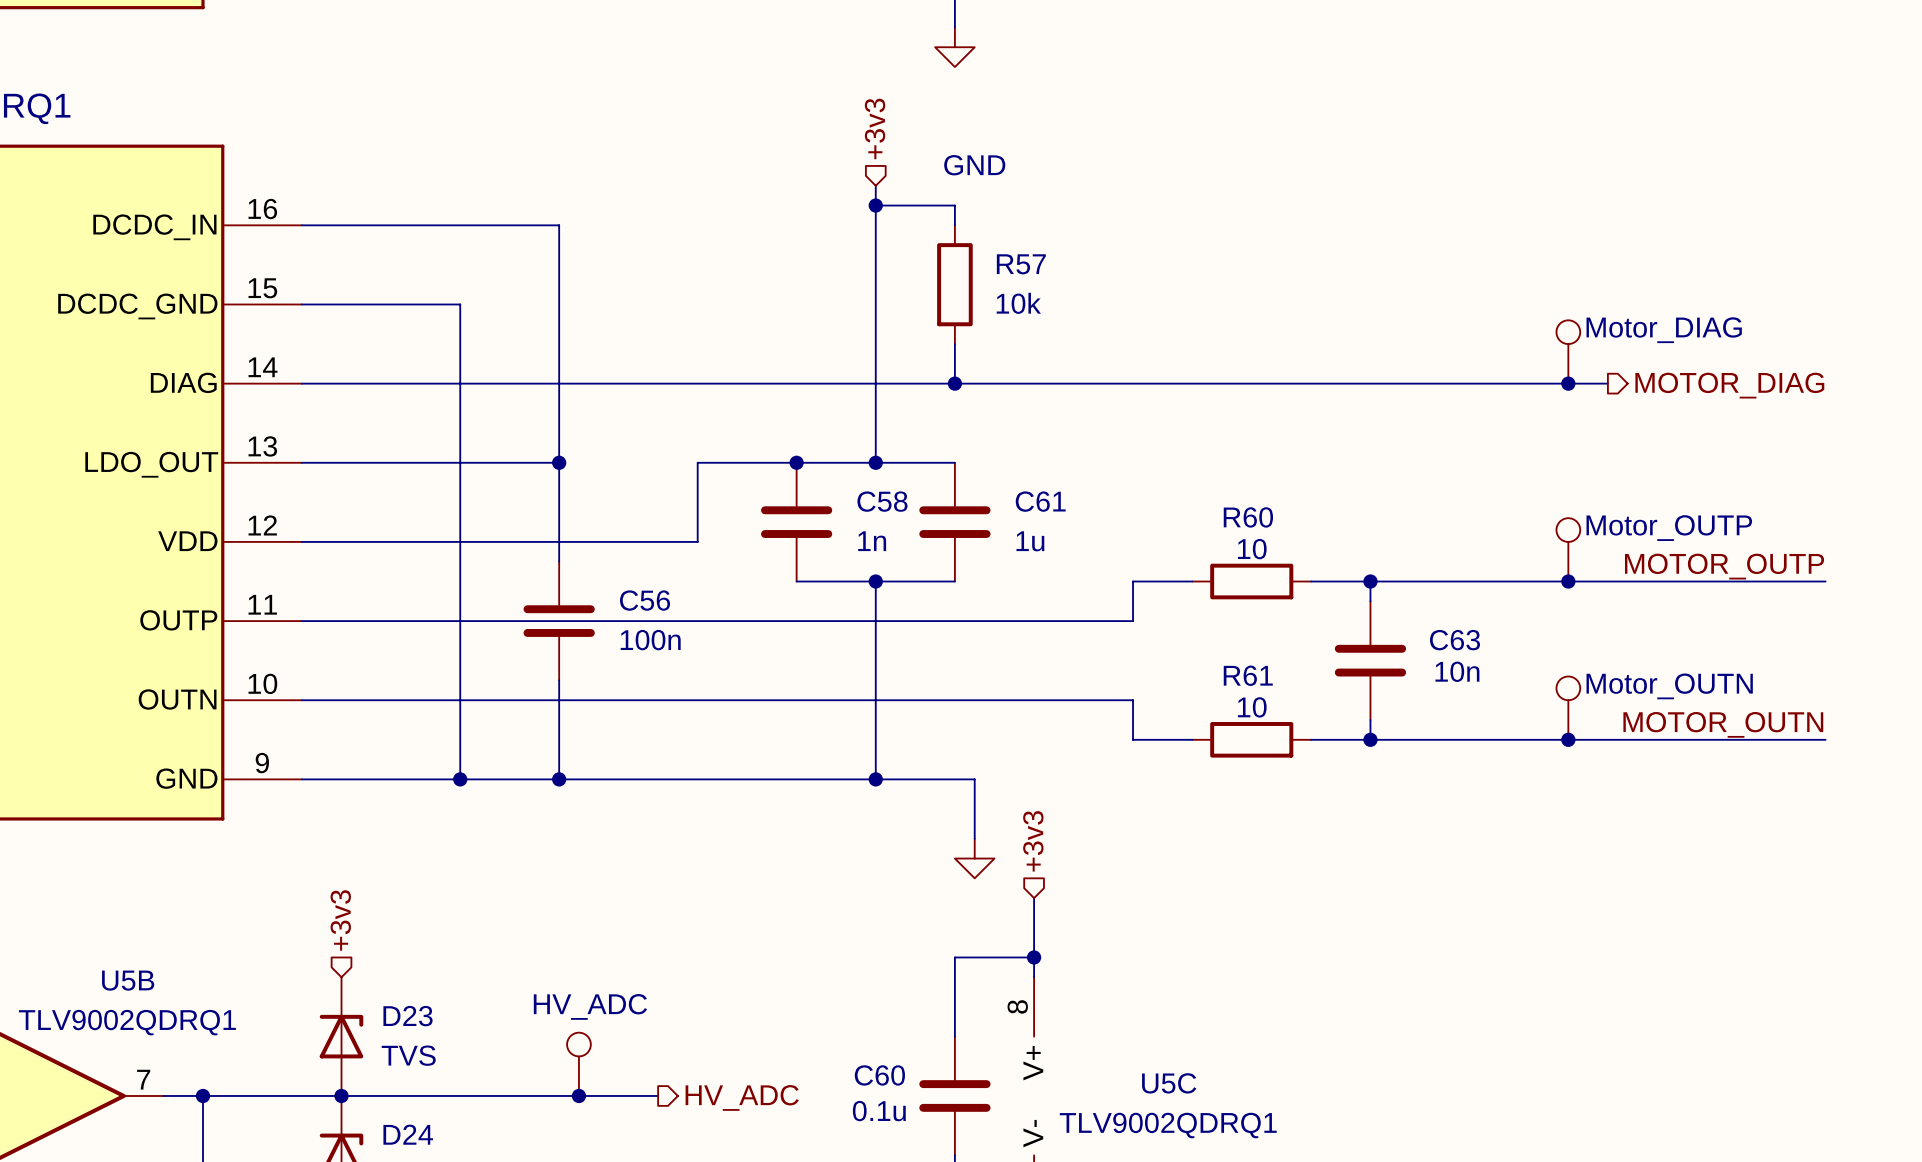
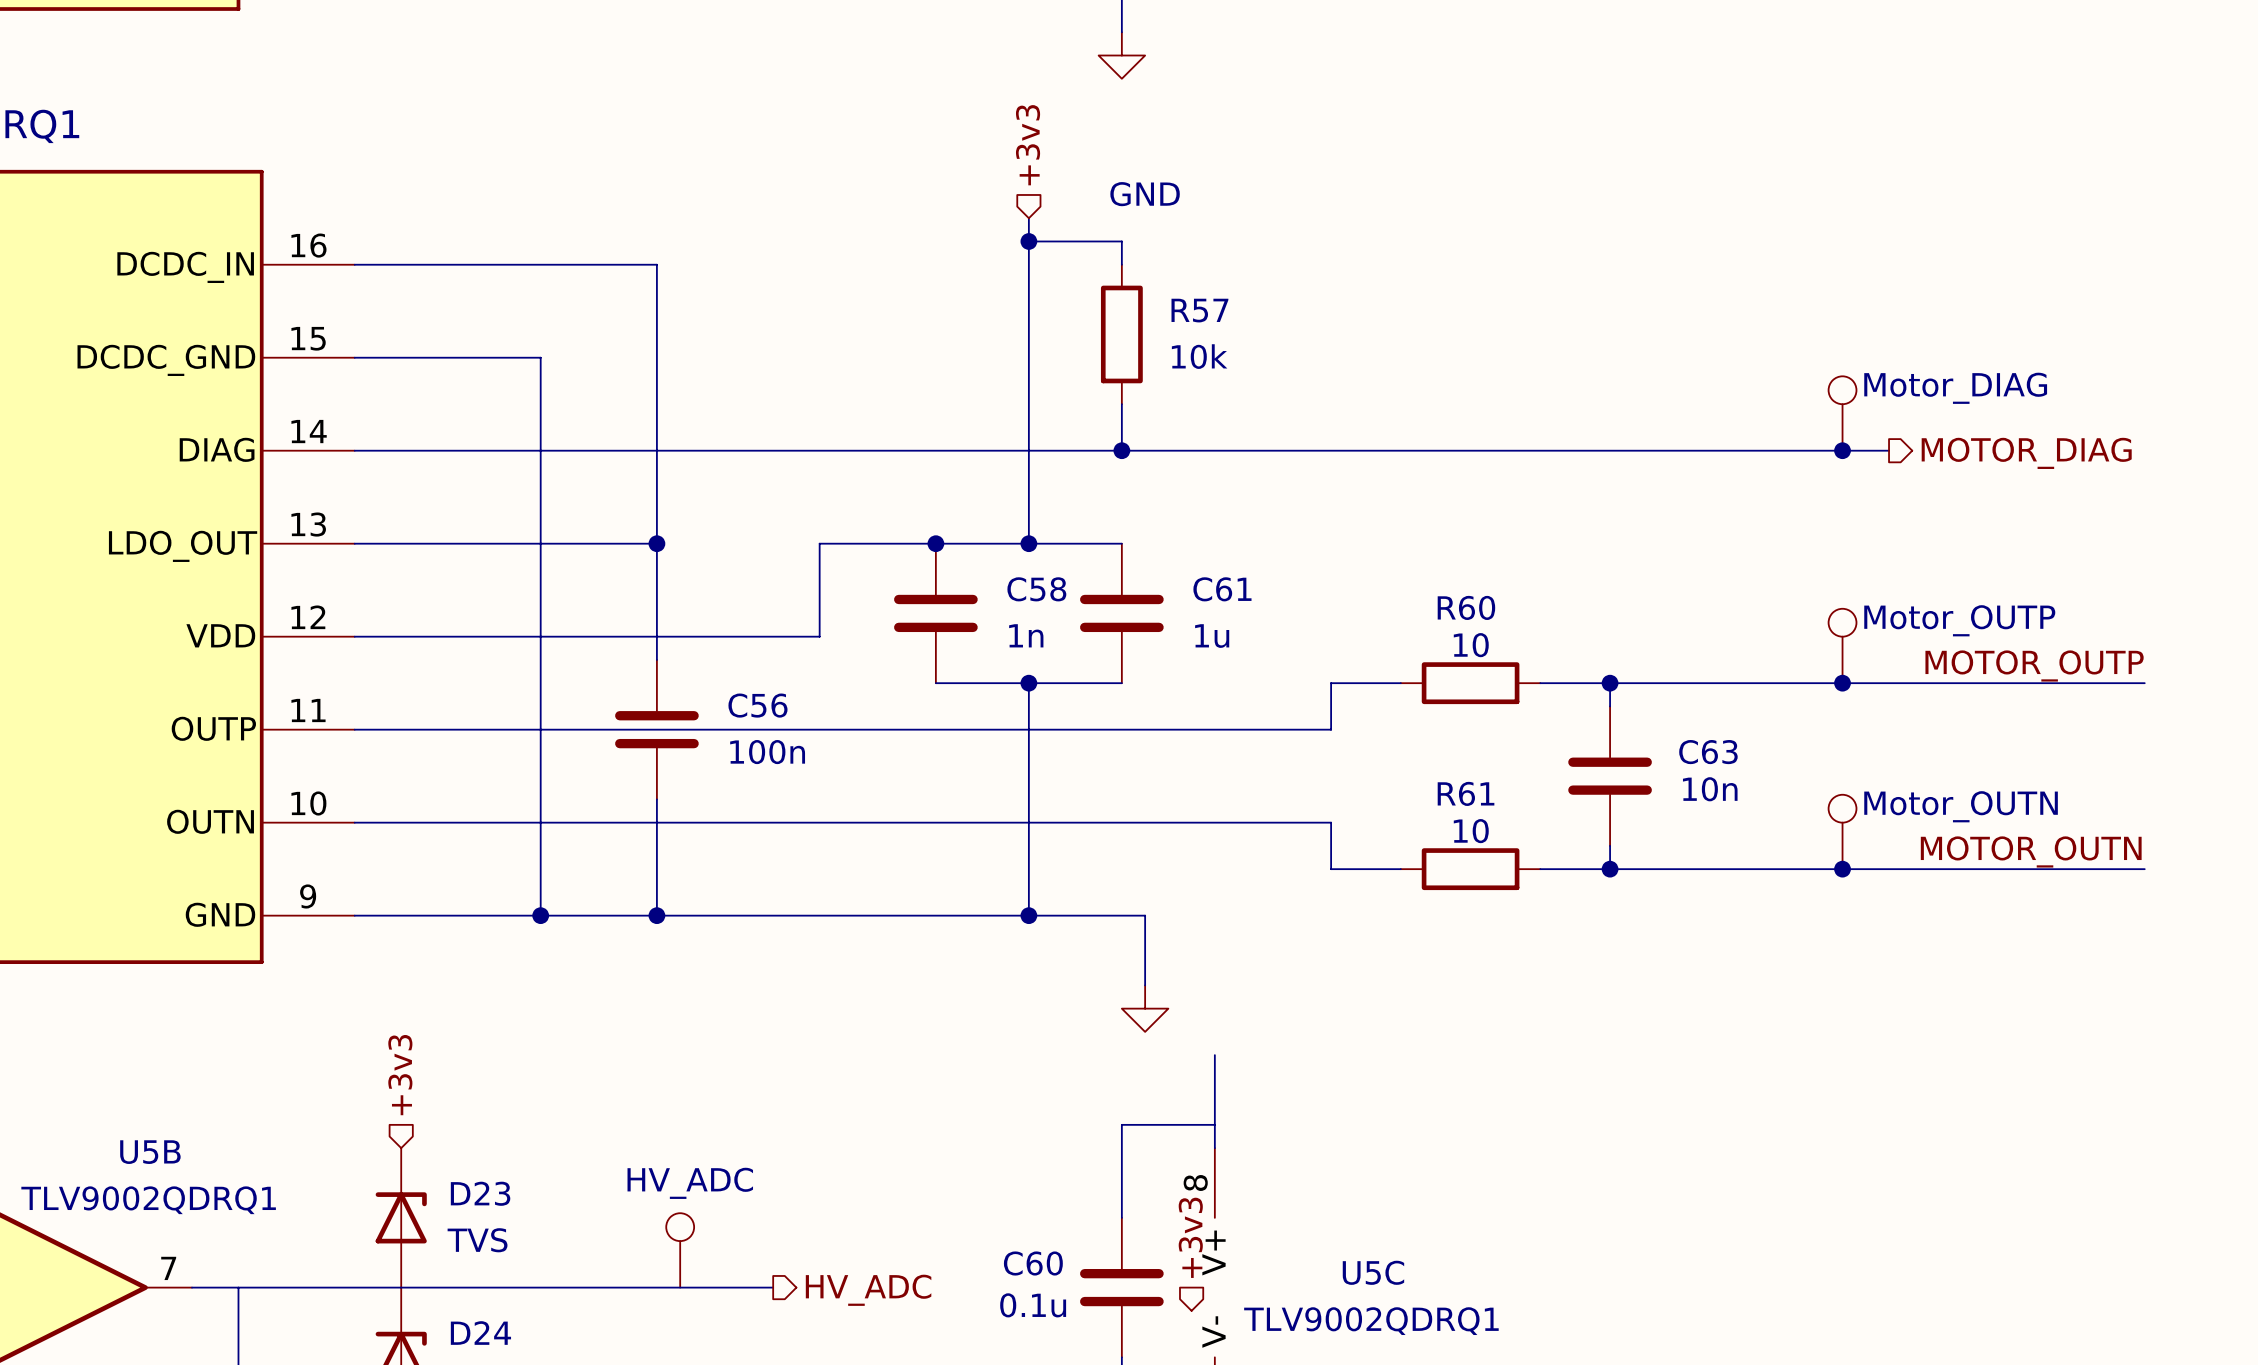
hierarchical label position: +3v3 (1033, 841) -> +3v3 (1190, 1237)
junction: (1034, 957) -> none
junction: (202, 1095) -> none
junction: (341, 1095) -> none
junction: (578, 1095) -> none

